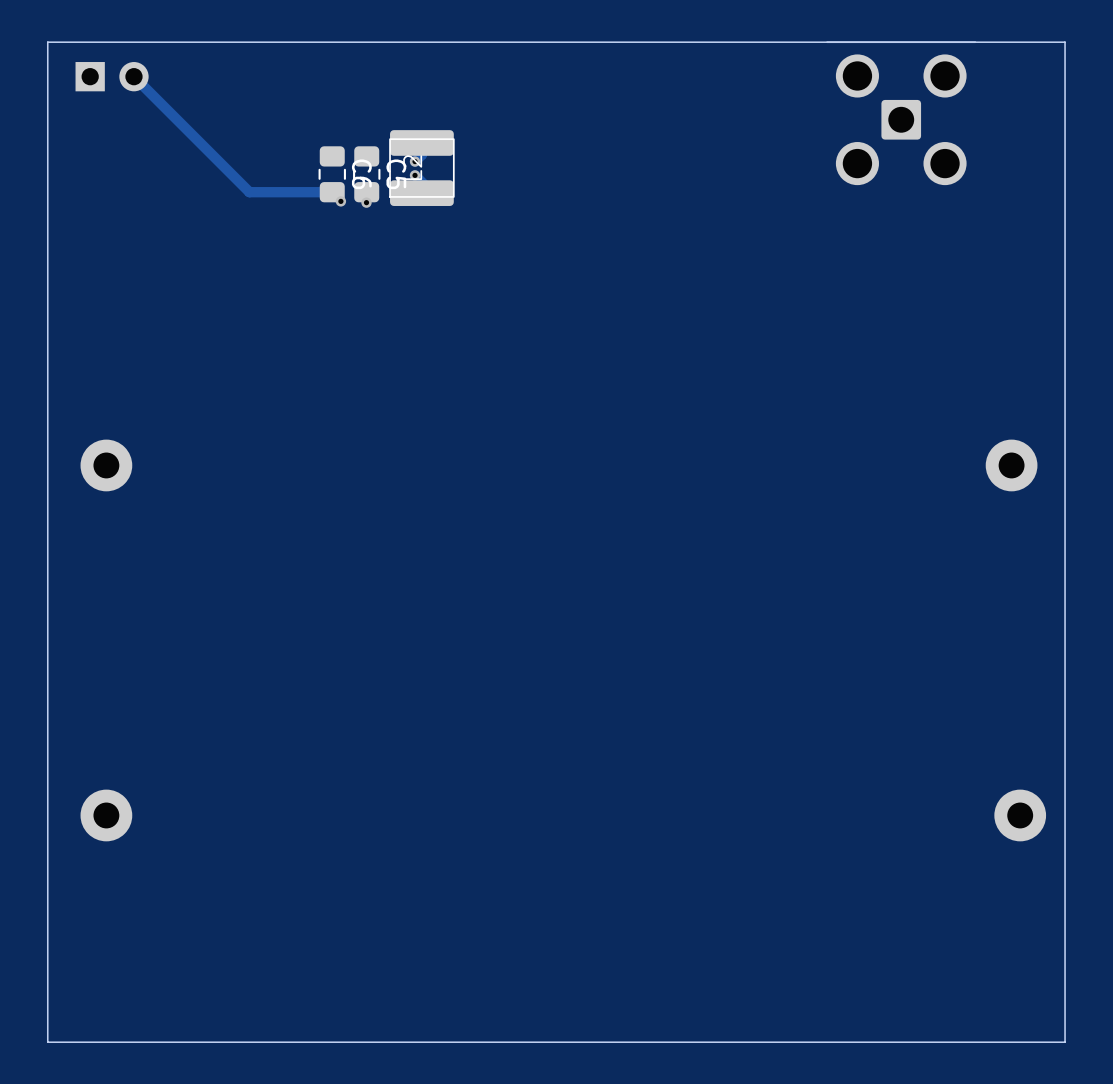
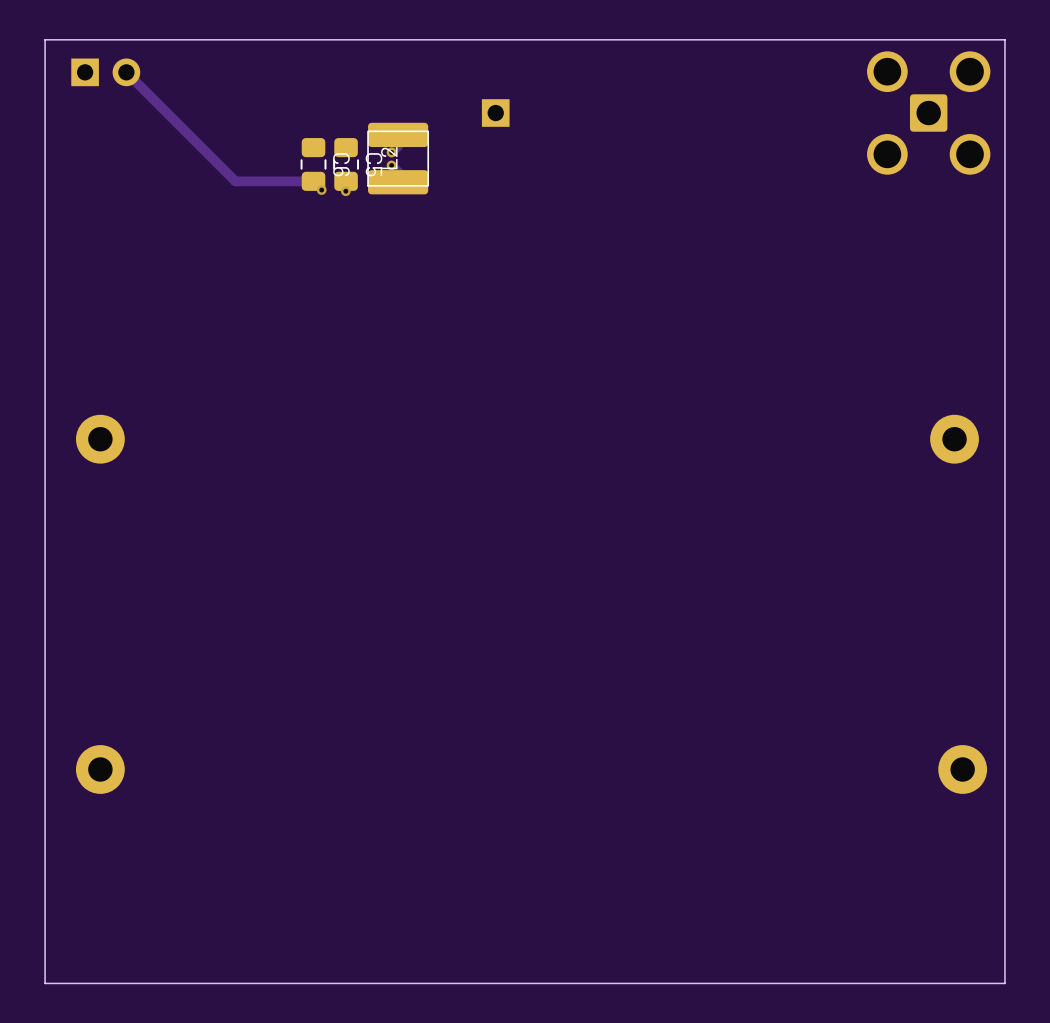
part: (901, 113) -> none
part: none -> (495, 113)
part: none -> (928, 113)

